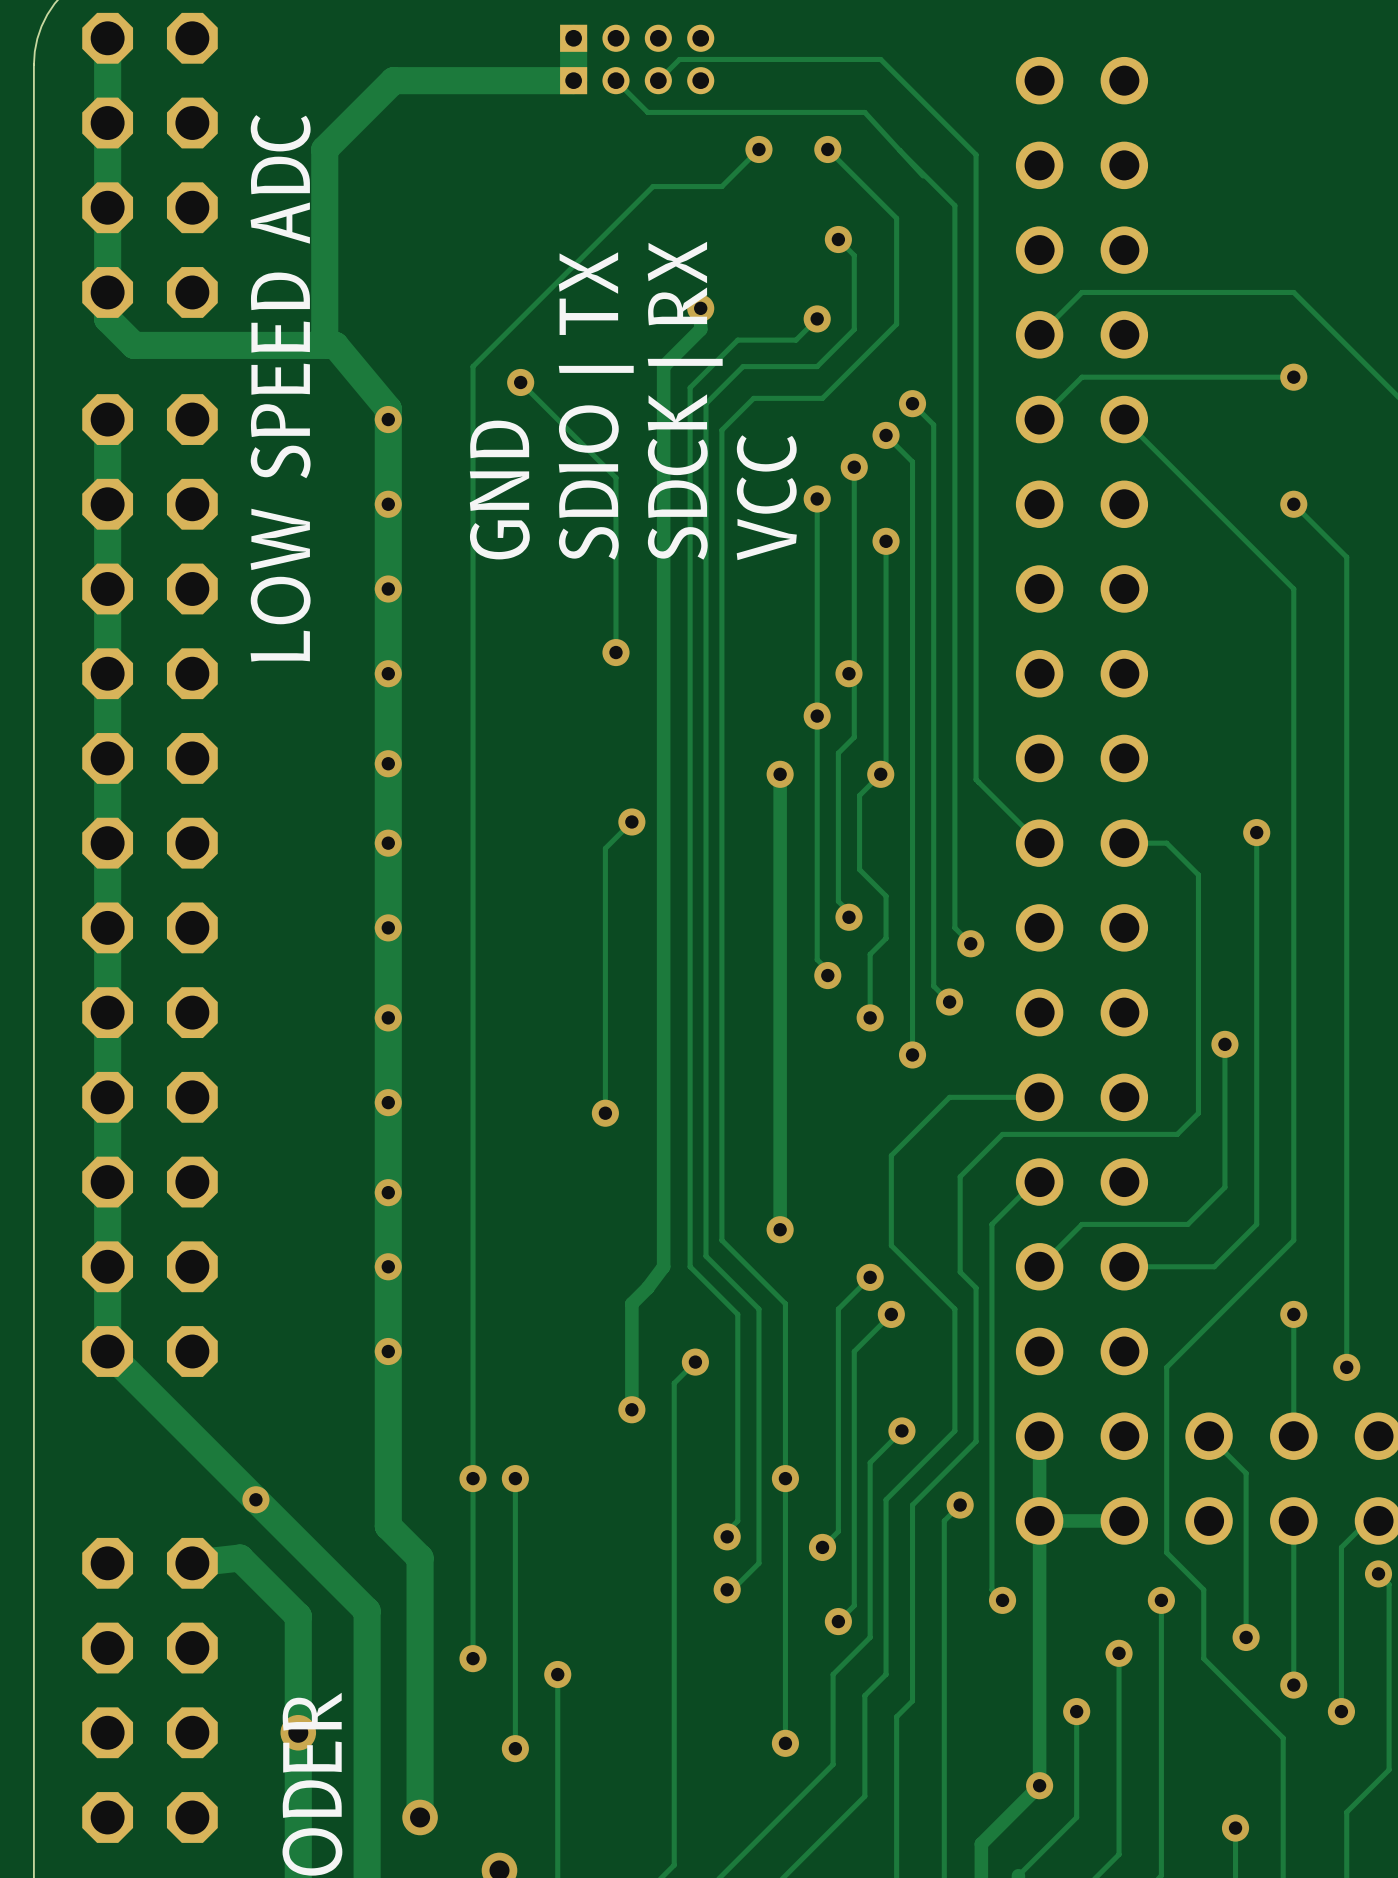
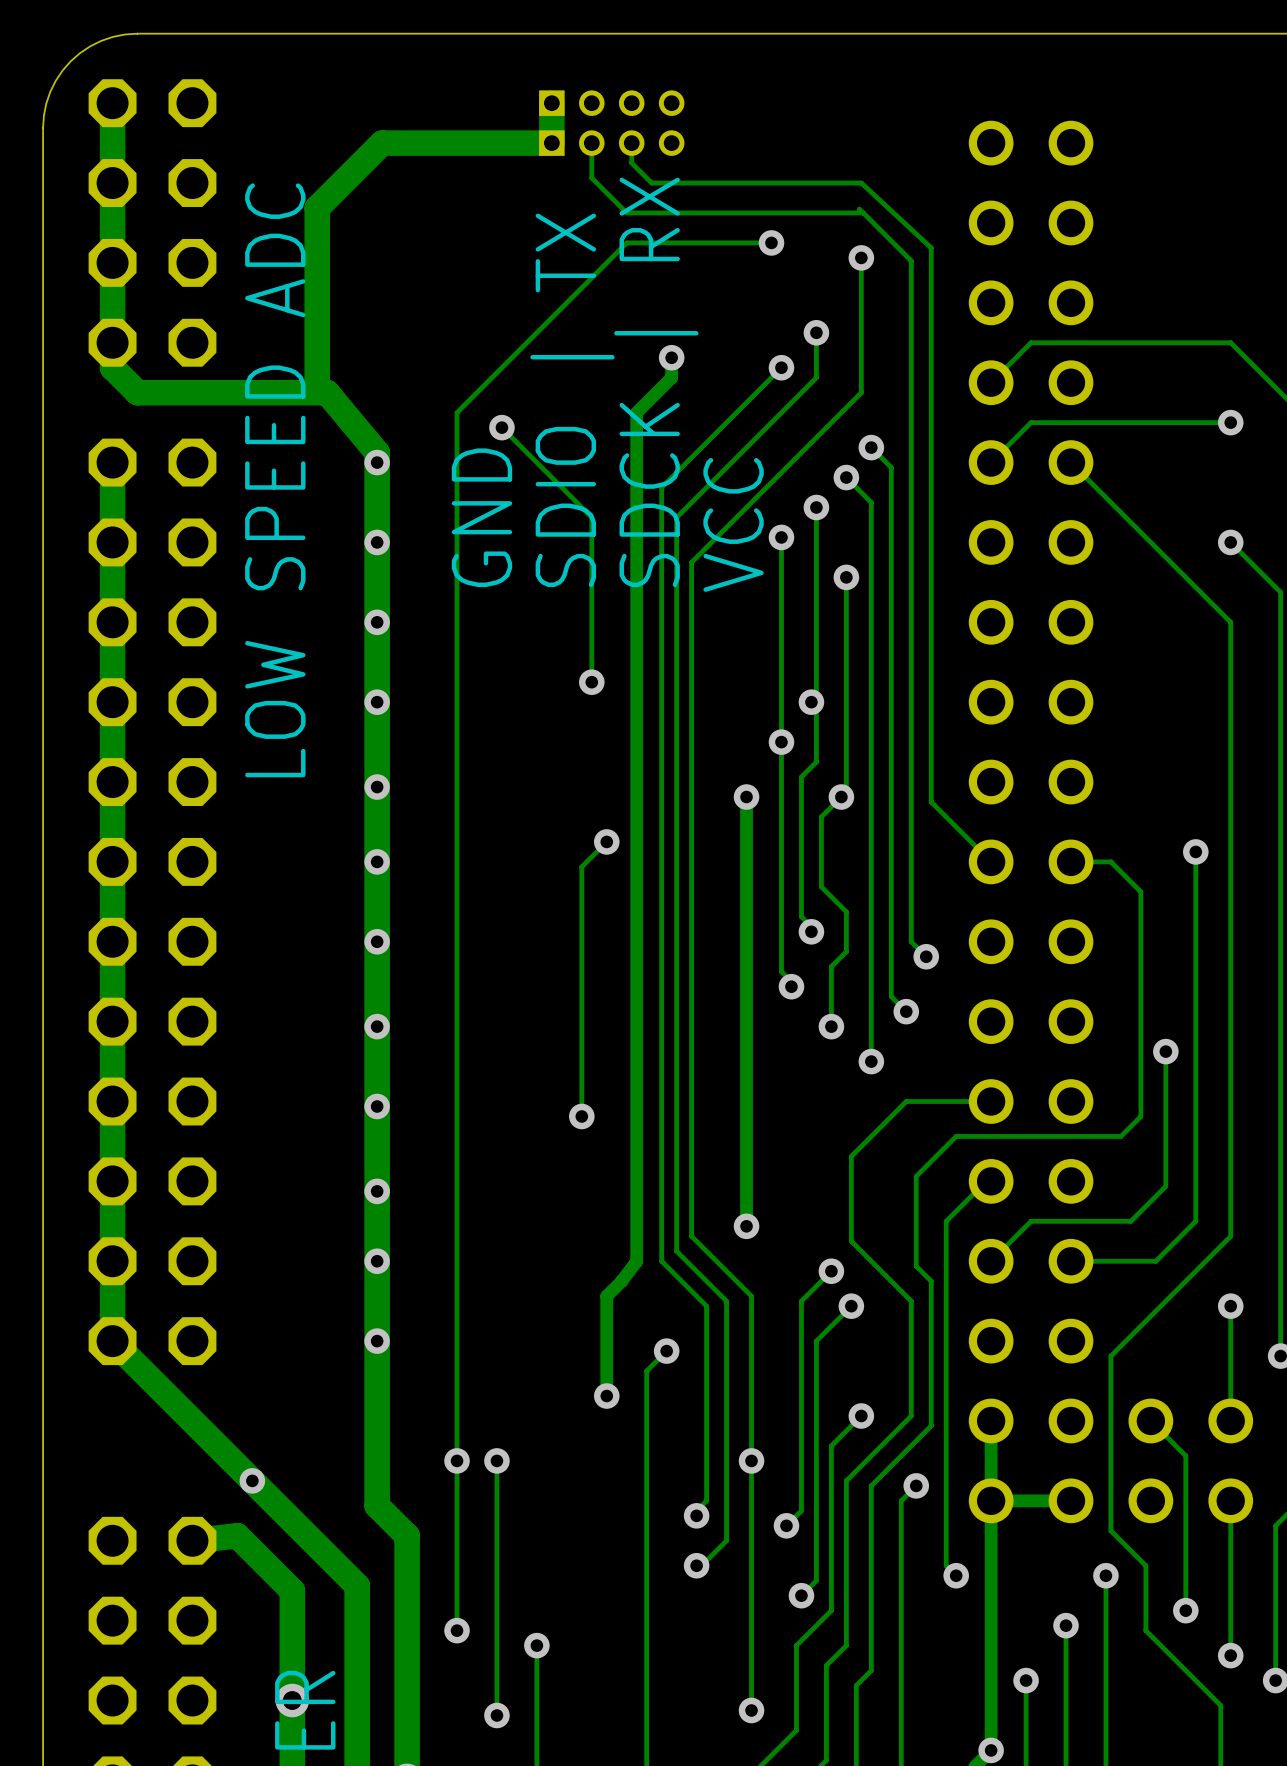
track: (615, 80) (647, 112) (864, 112) (923, 175) -> (591, 143) (591, 178) (626, 212) (863, 212)
track: (658, 80) (679, 59) (880, 59) (976, 154) (976, 191) -> (631, 143) (631, 163) (651, 183) (861, 183) (931, 247)
track: (758, 149) (721, 186) -> (771, 242) (691, 242)
via: (758, 149) -> none
track: (827, 149) (896, 218) (896, 324) (822, 398) (753, 398) (721, 430) (721, 525) -> (861, 257) (861, 392) (691, 562)
via: (827, 149) -> none
via: none -> (771, 242)
via: none -> (861, 257)
track: (838, 239) (854, 255) (854, 281) -> none
via: (838, 239) -> none
via: none -> (816, 332)
track: (796, 340) (737, 340) (690, 387) (690, 446) -> (761, 387) (661, 487)
track: (817, 366) (743, 366) (706, 403) (706, 477) -> (781, 412) (676, 517)

